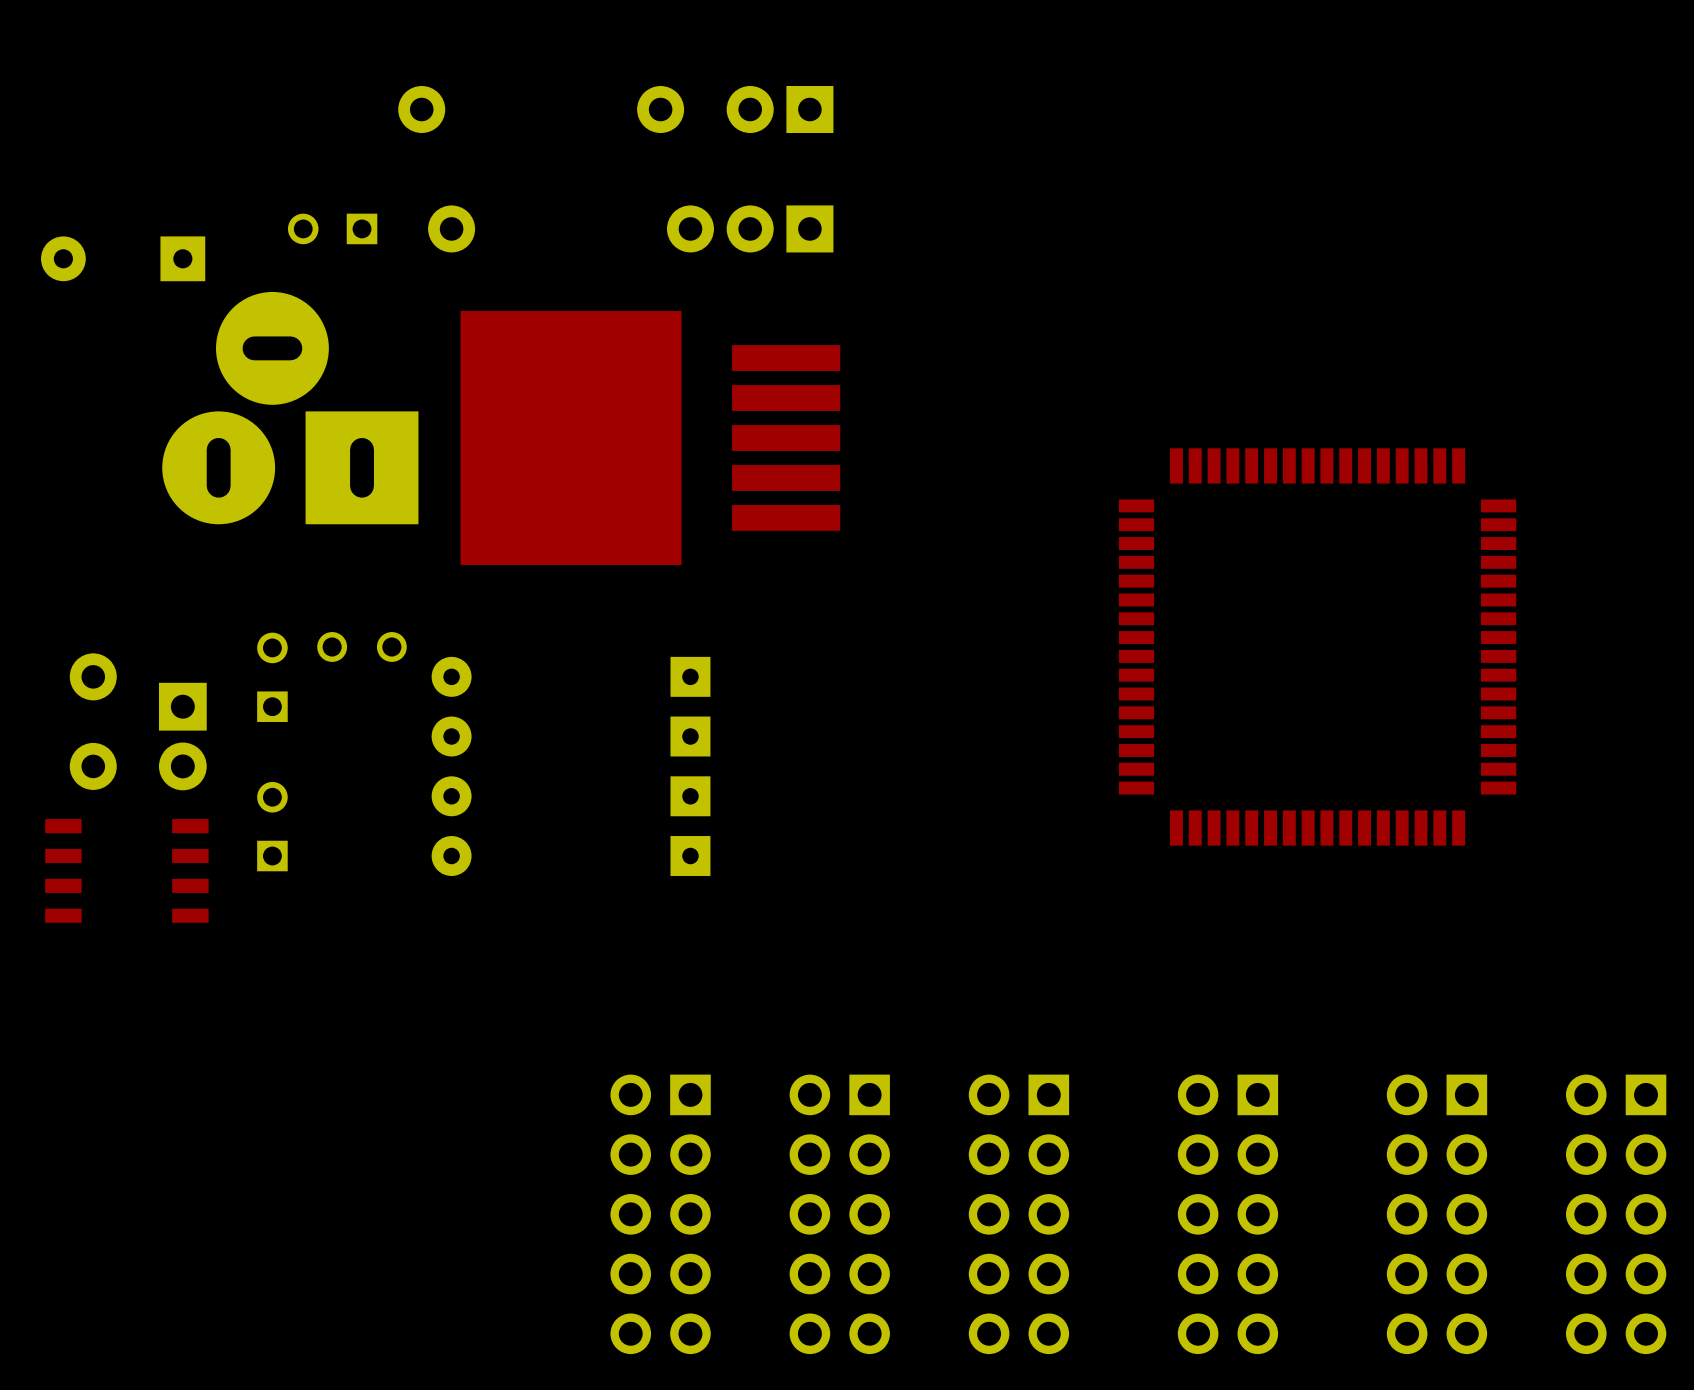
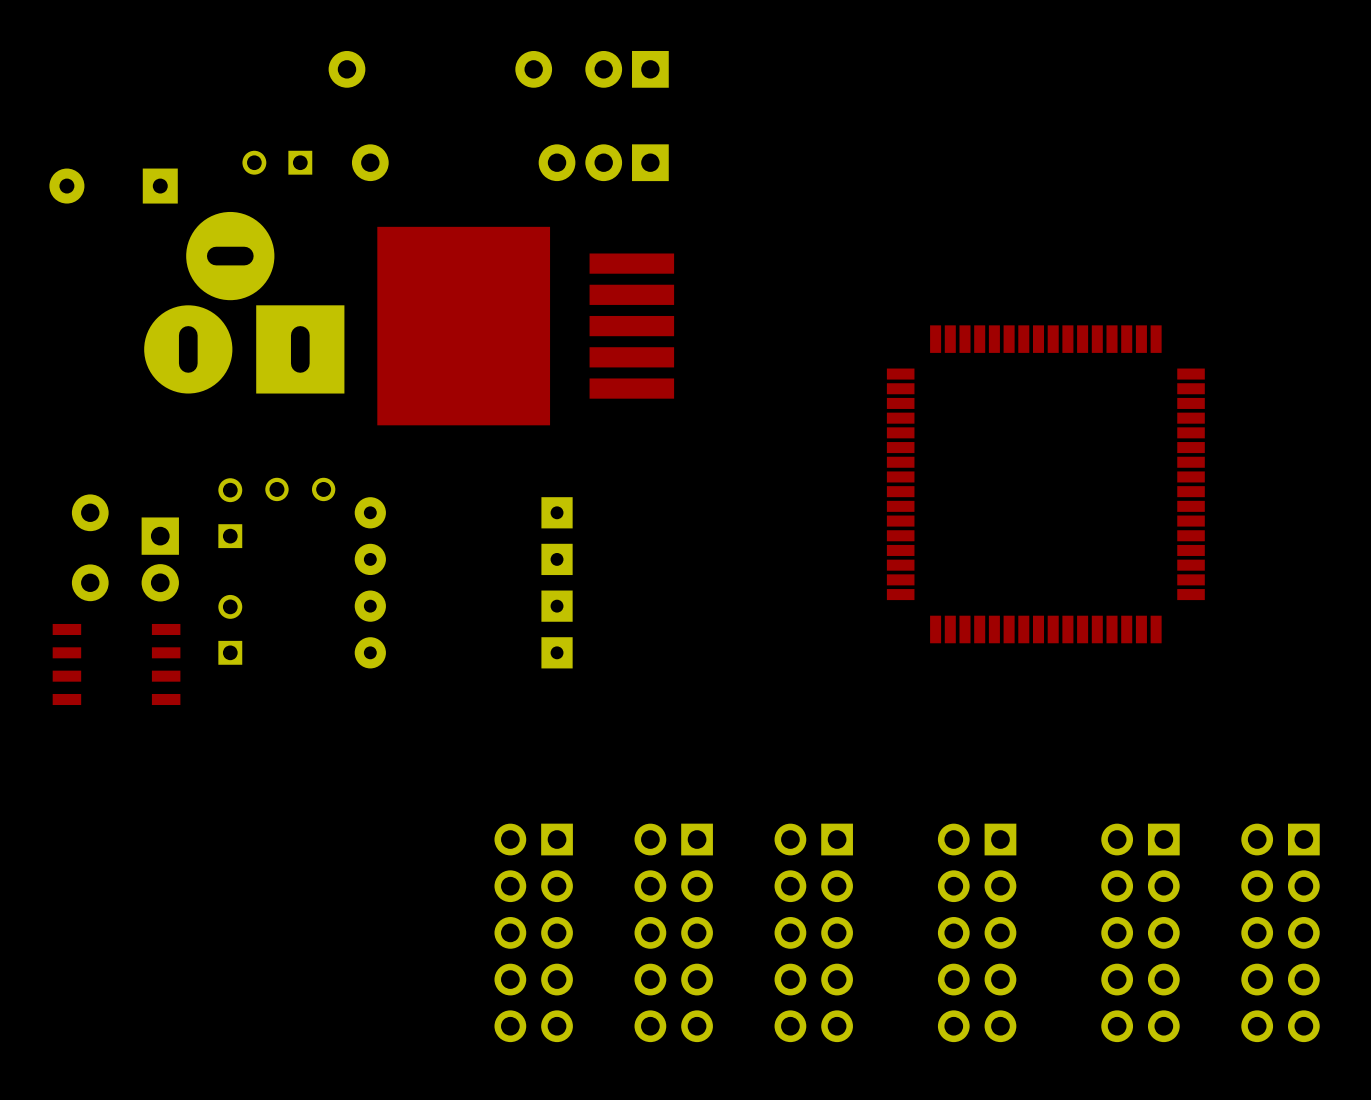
part footprint: [1118, 448, 1517, 846] -> [886, 325, 1205, 644]

